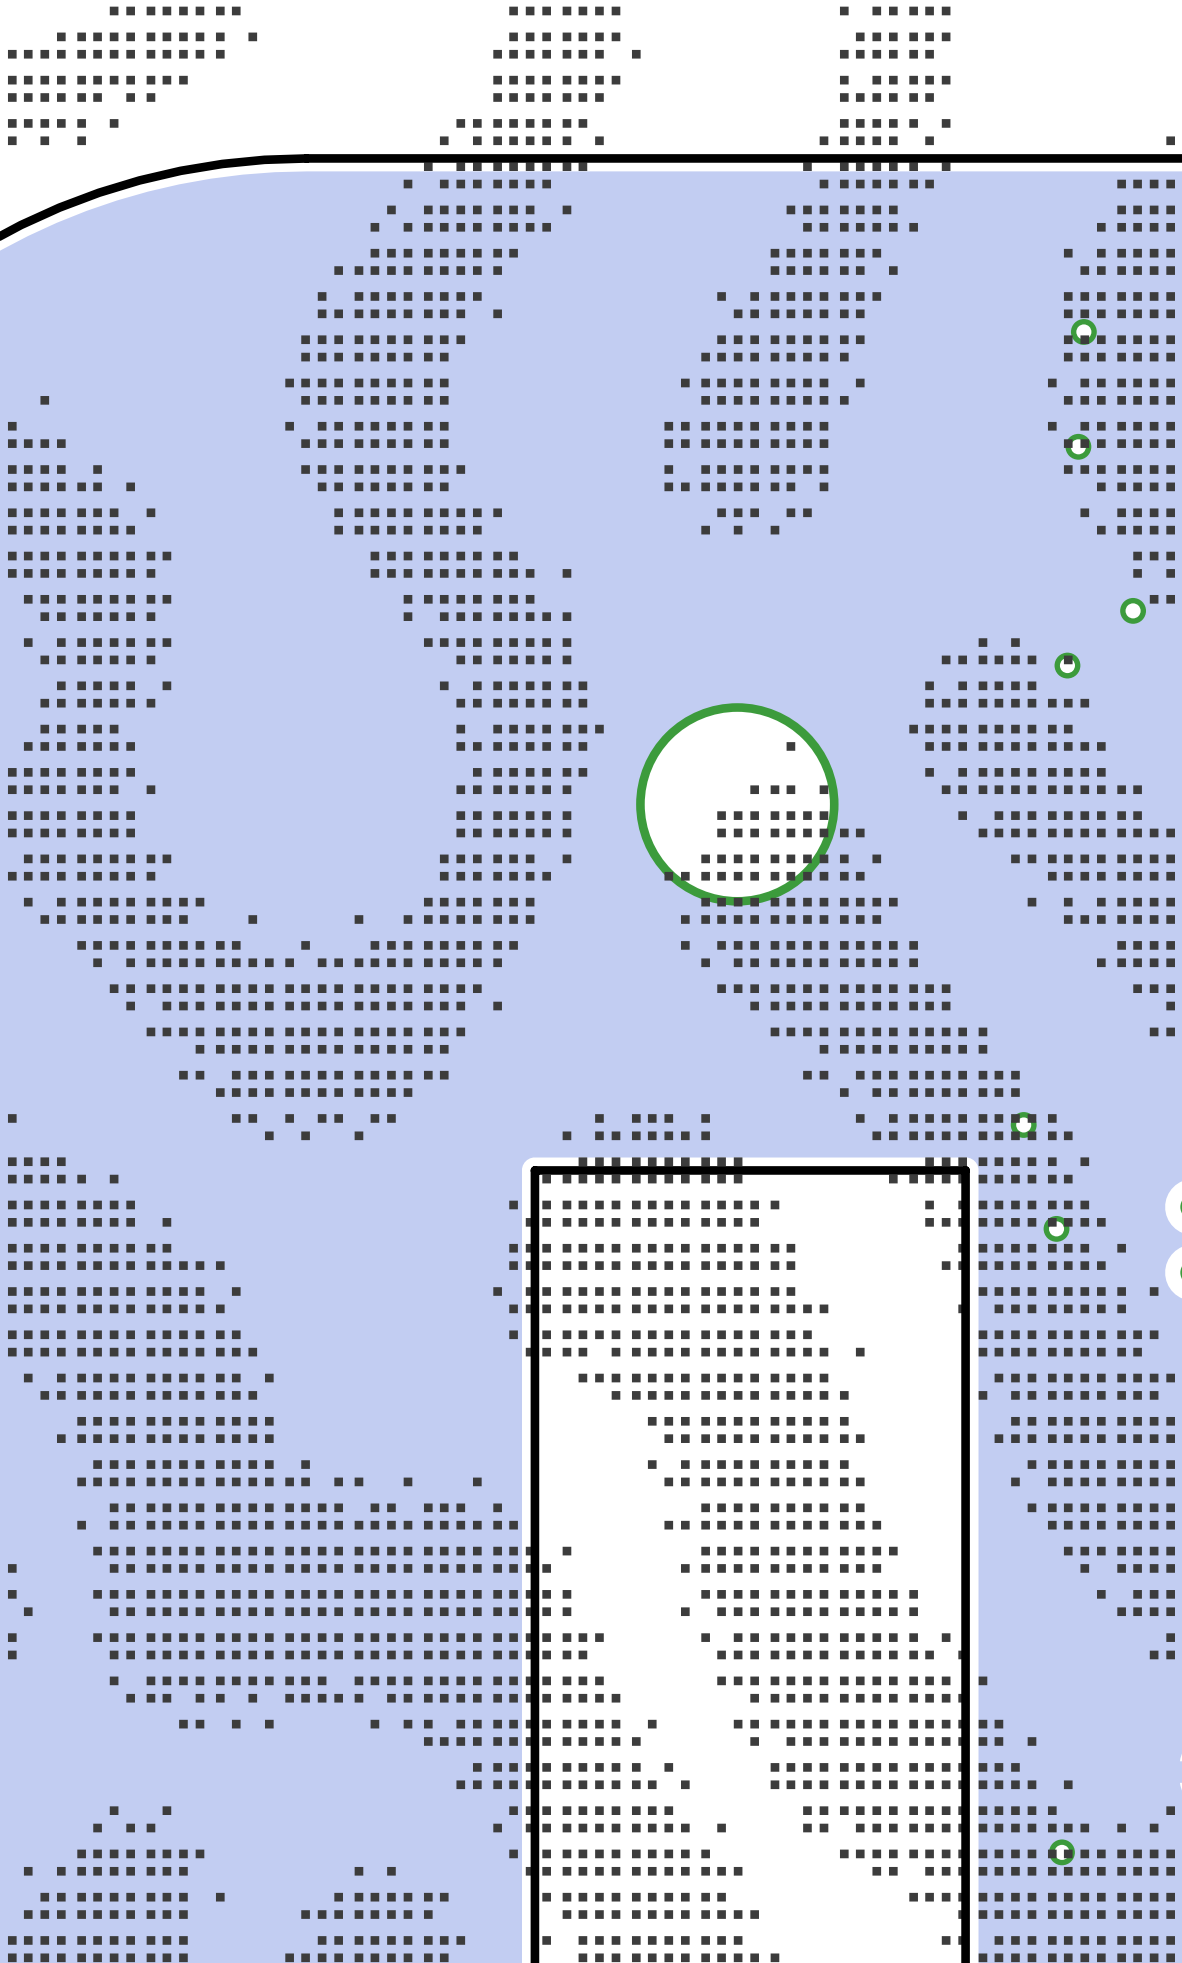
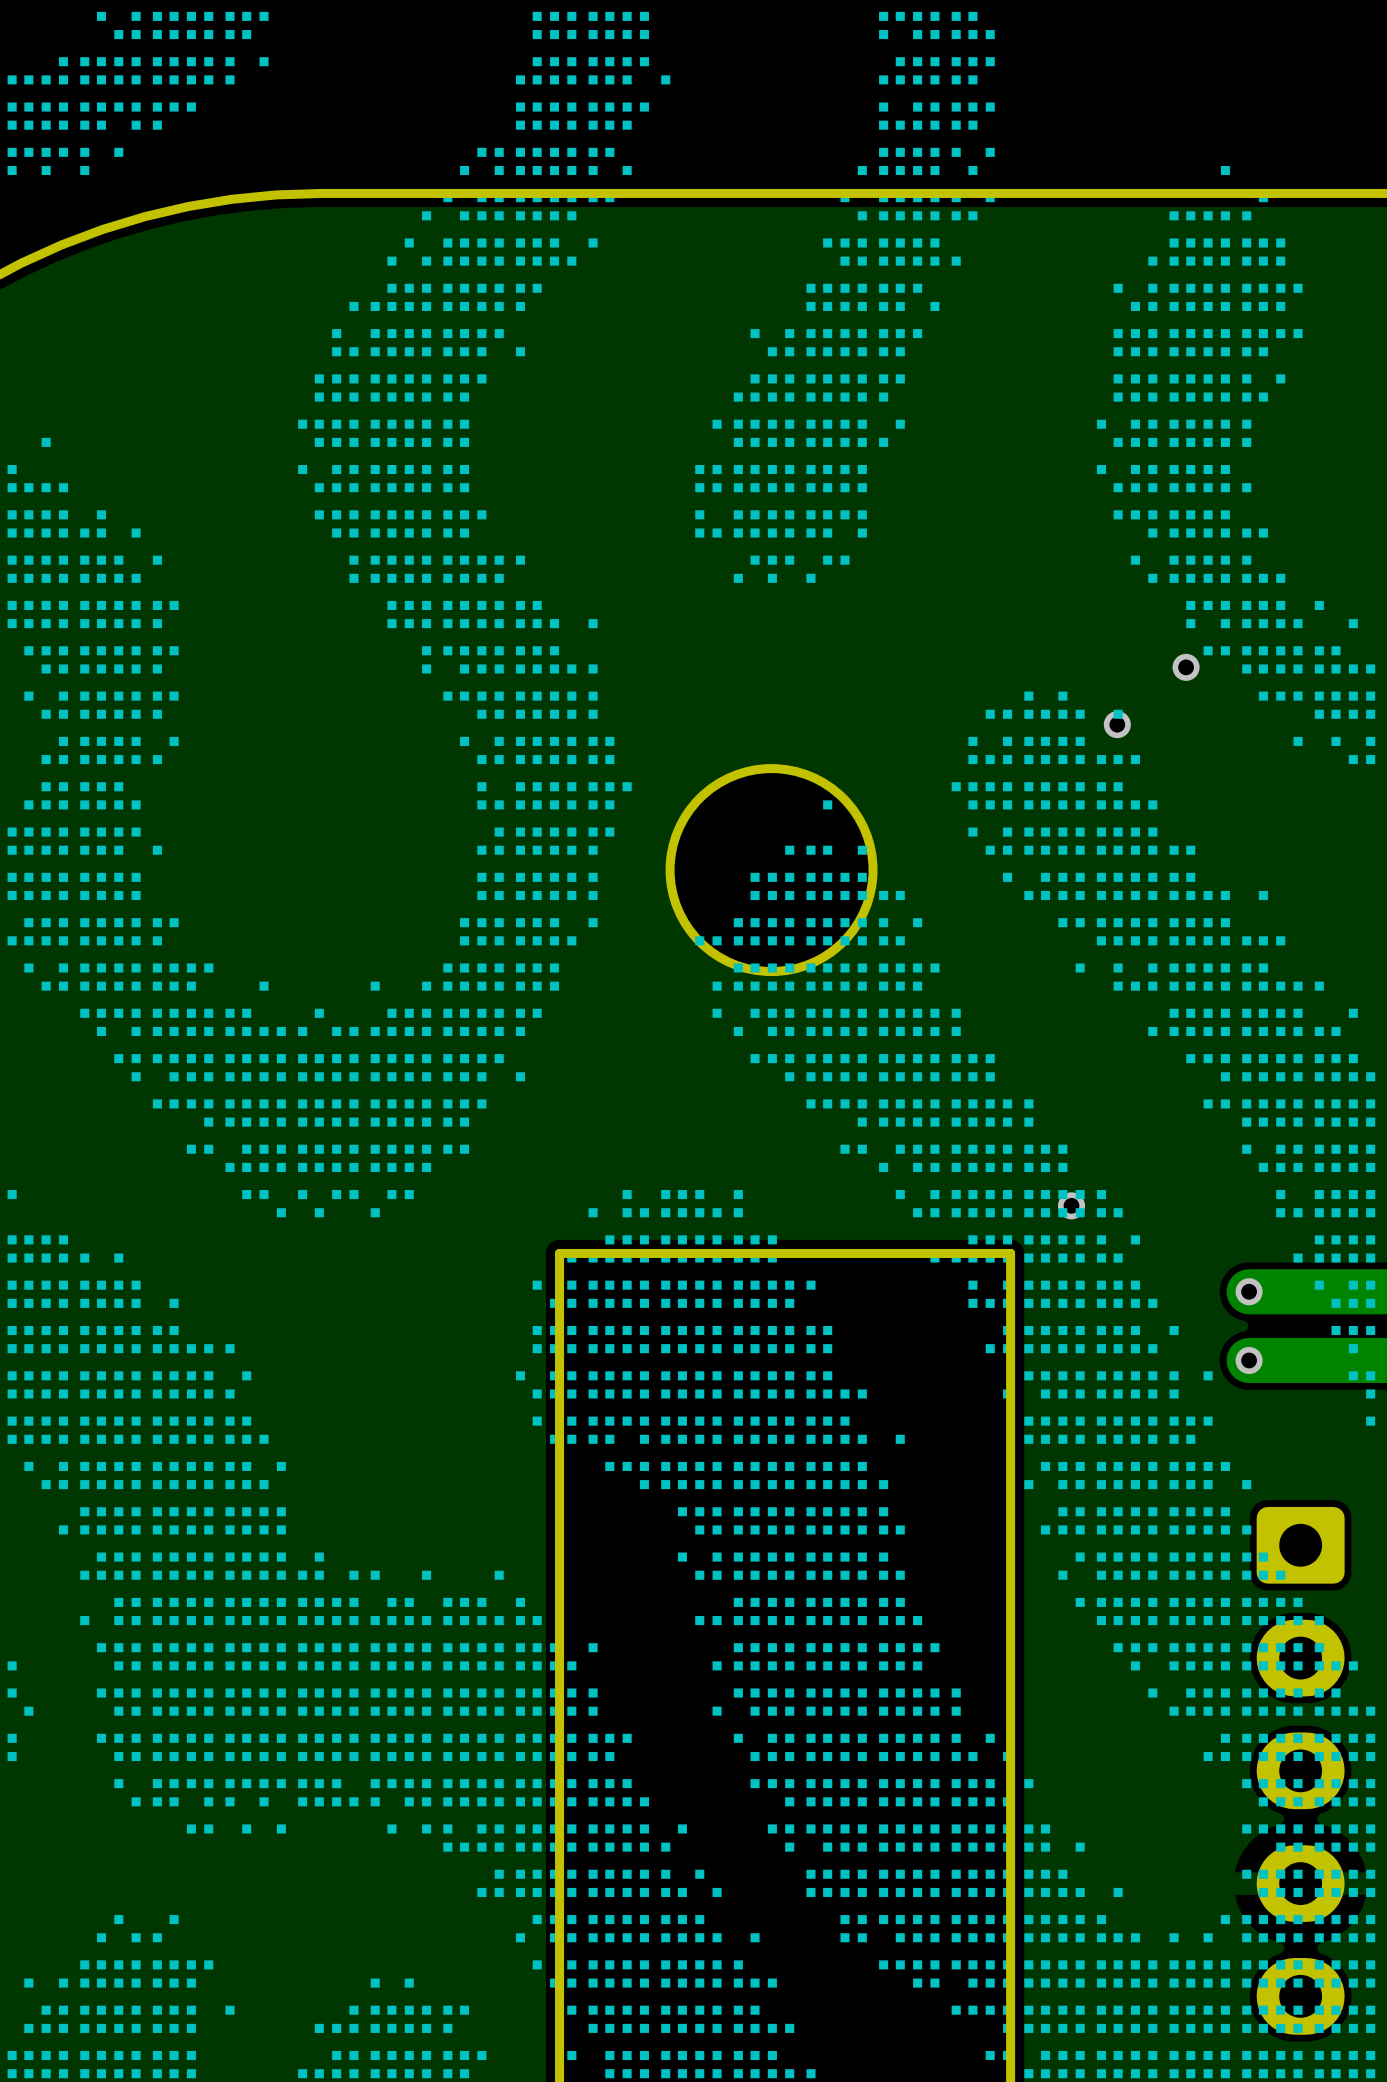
via: (1083, 331) -> none
via: (1078, 446) -> none
via: (1056, 1228) -> none
via: (1061, 1852) -> none

